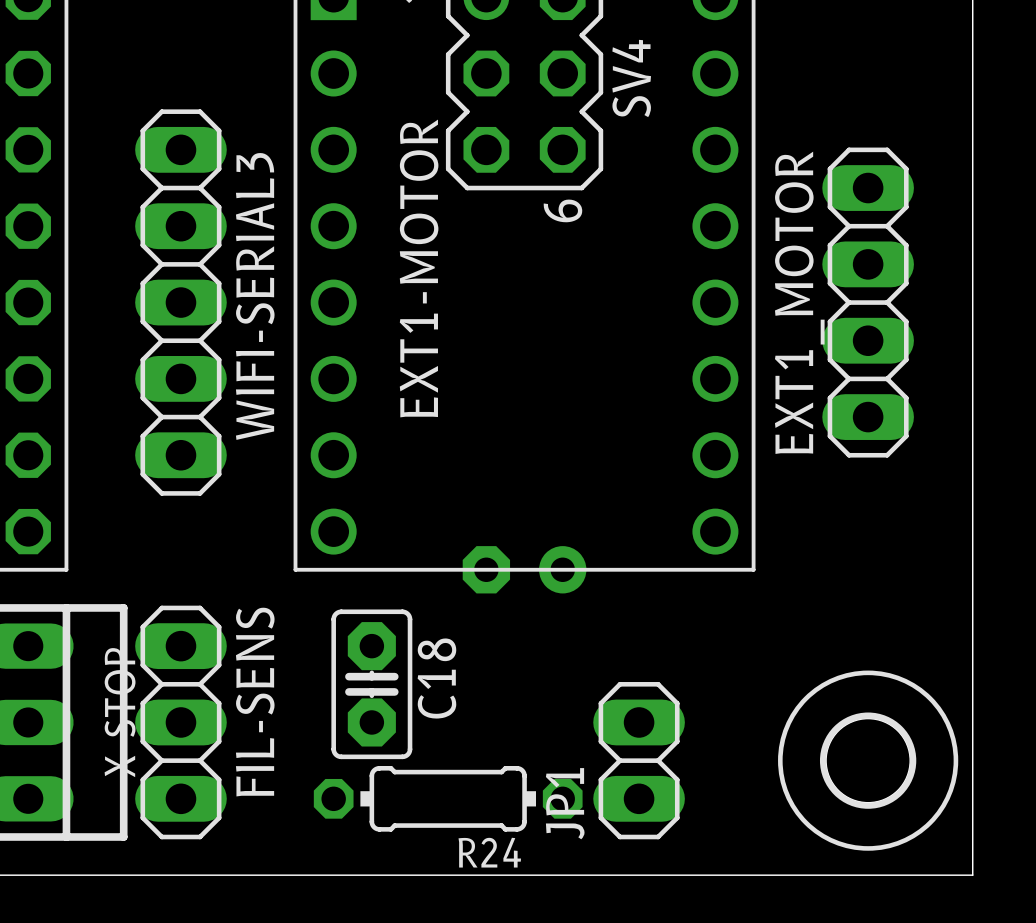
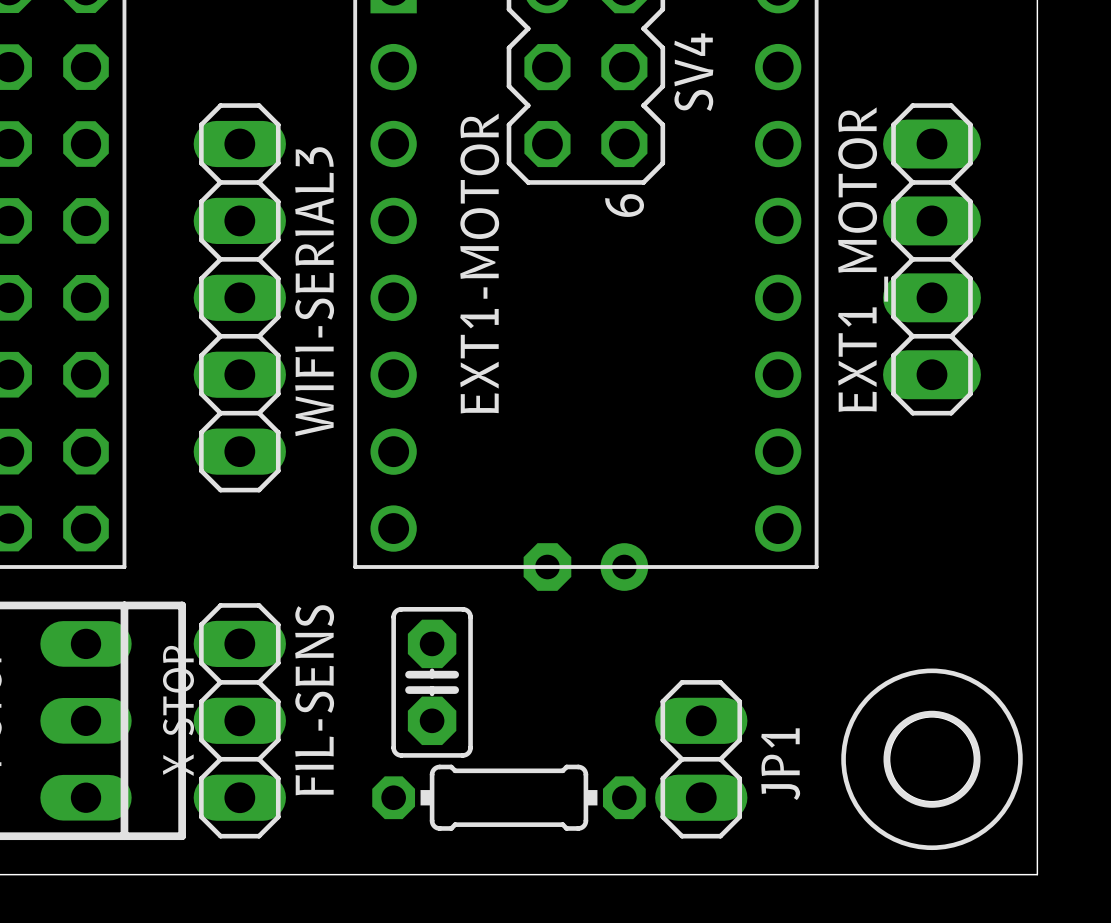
EXT1_MOTOR footprint: [822, 147, 914, 458] -> [883, 103, 981, 416]
C18 name: C18 (436, 678) -> none
R24: (448, 798) -> none
part: none -> (509, 797)
JP1 name position: JP1 (565, 803) -> JP1 (780, 764)

